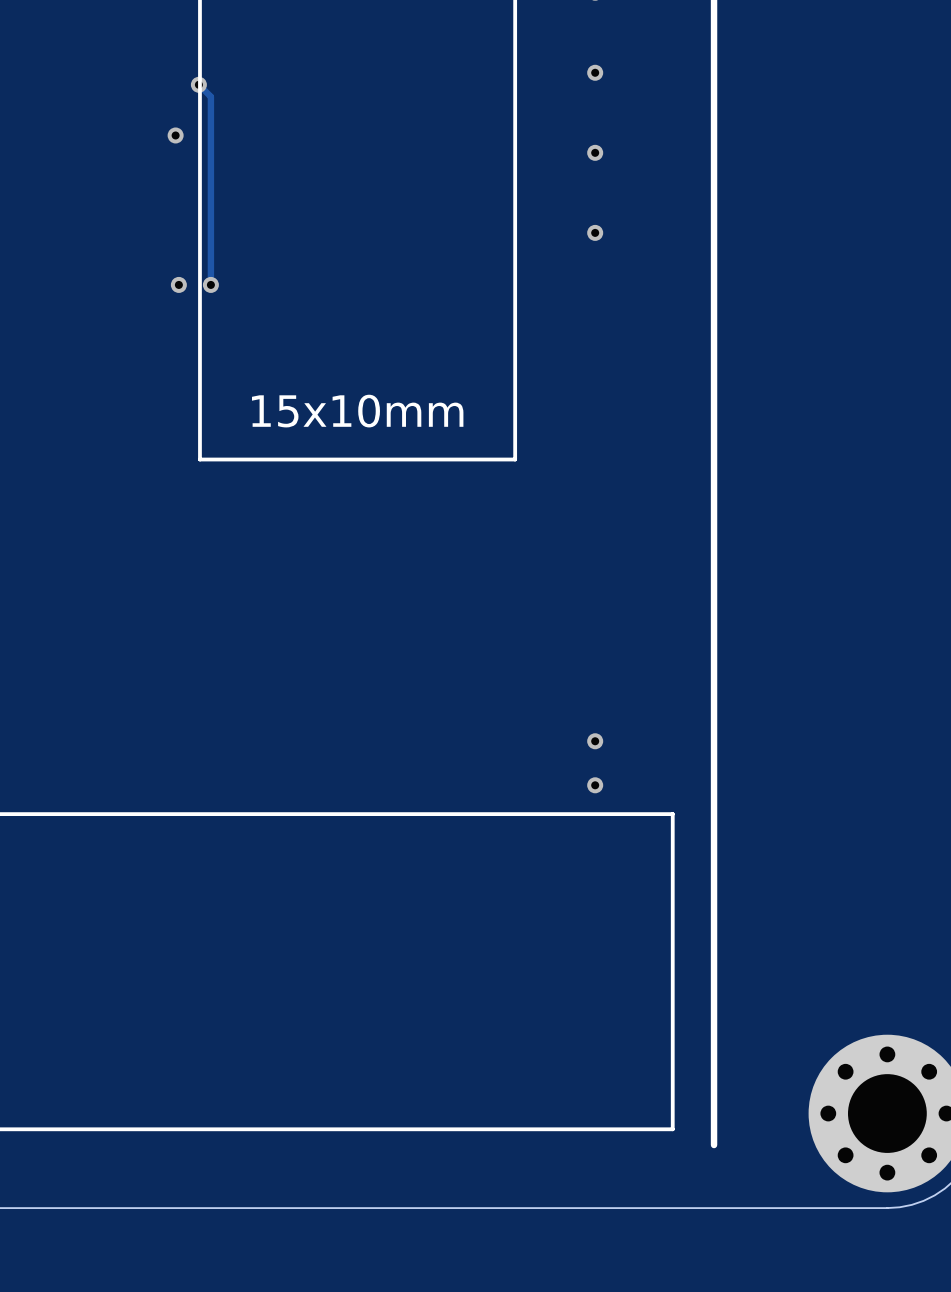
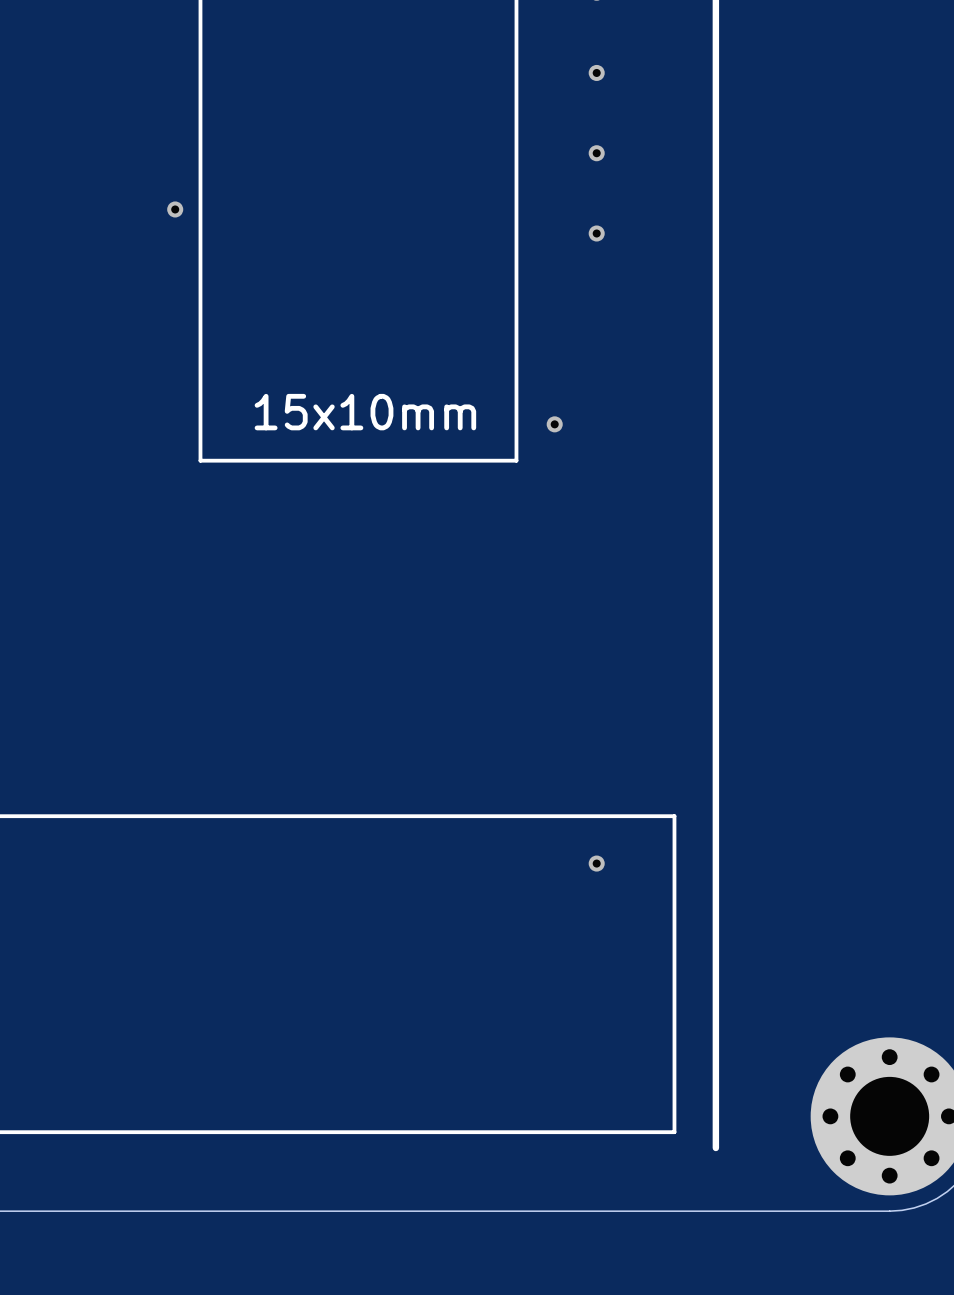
track: (198, 84) (210, 96) (210, 284) -> none
via: (198, 84) -> none
via: (175, 135) -> none
via: none -> (175, 209)
via: (178, 284) -> none
via: (210, 284) -> none
via: none -> (554, 424)
via: (595, 741) -> none
via: (595, 785) -> none
via: none -> (596, 863)

